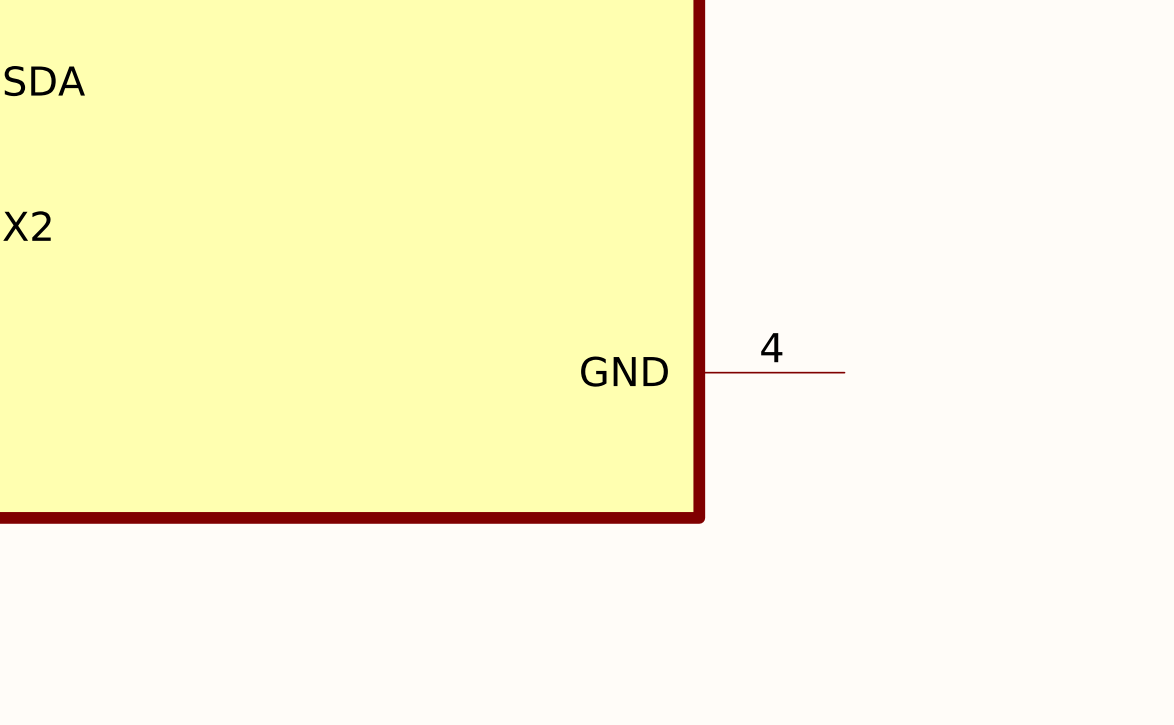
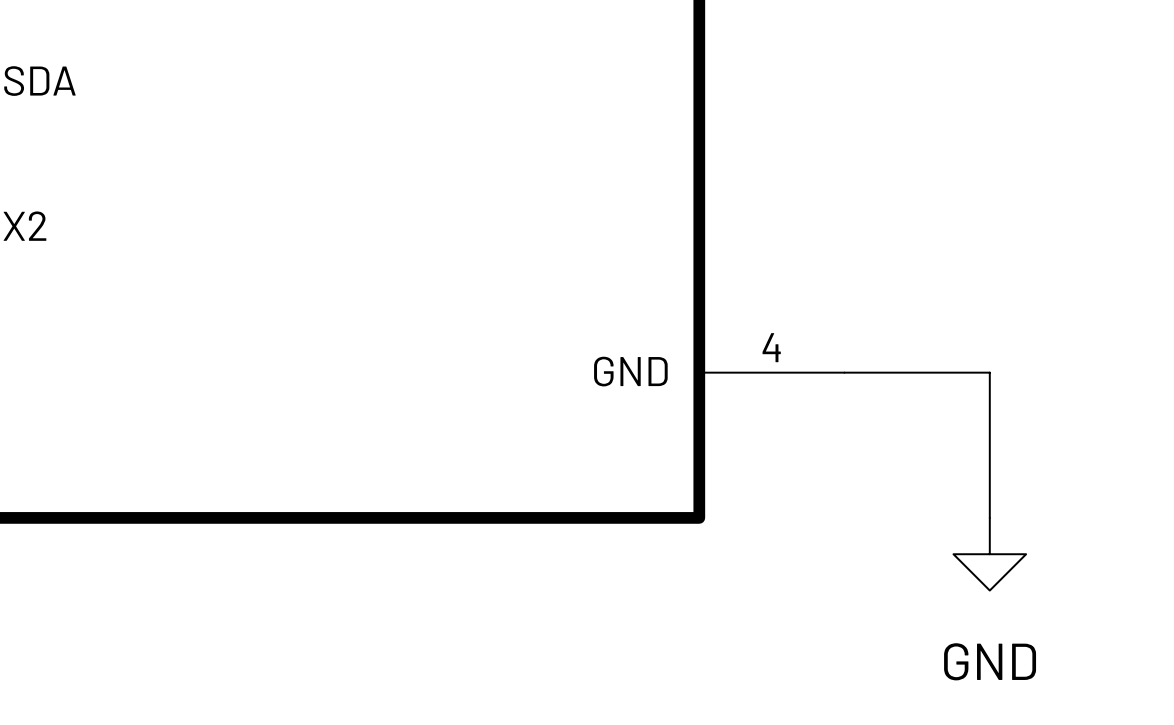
wire: none -> (844, 372) (989, 372) (989, 517)
power symbol: none -> GND (989, 554)

